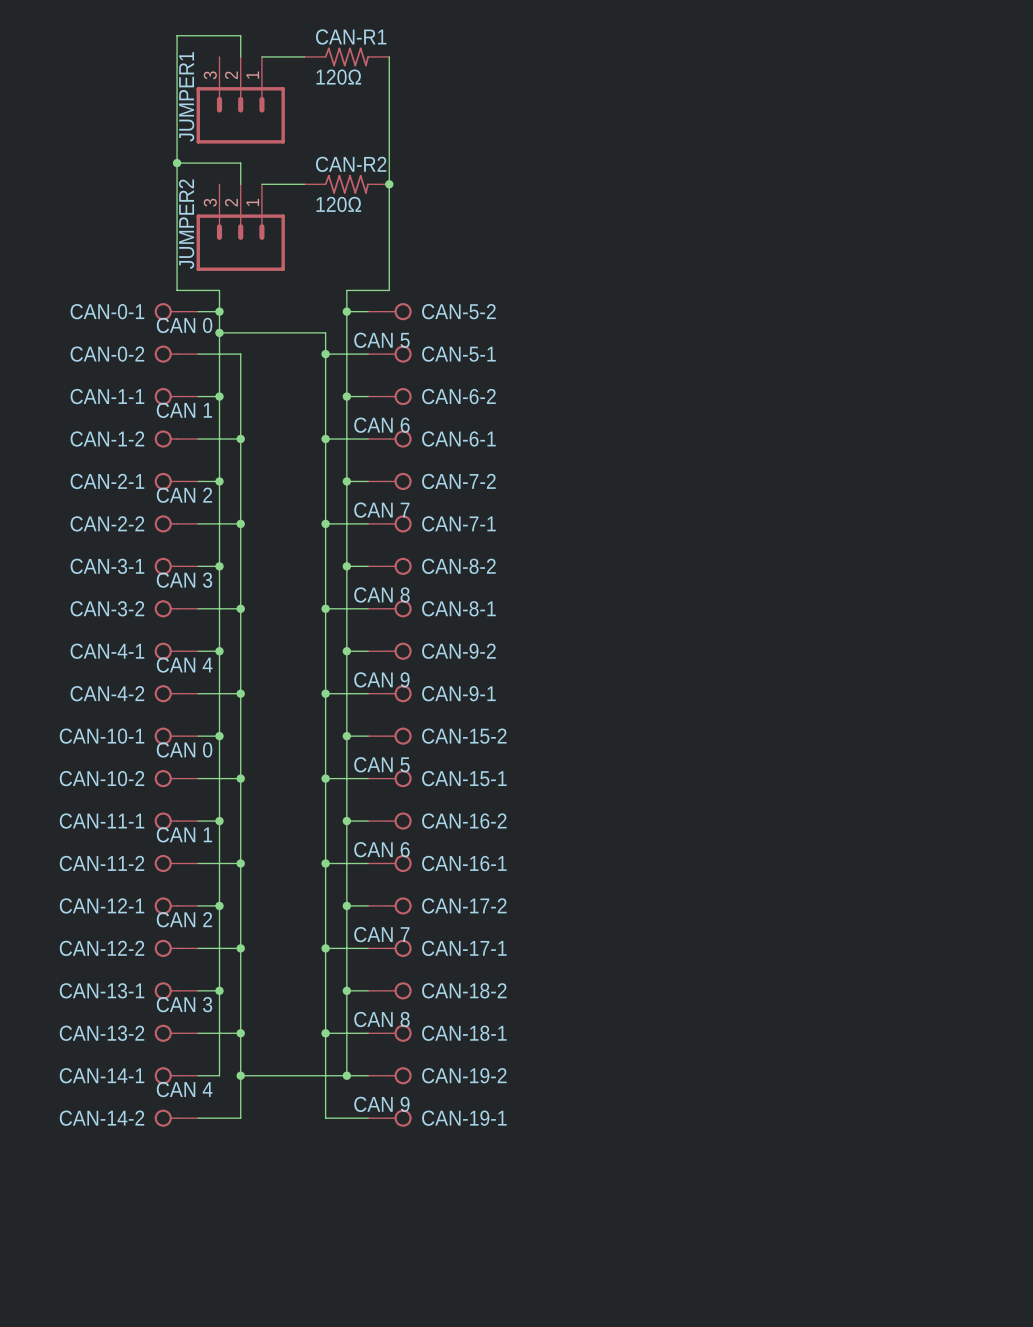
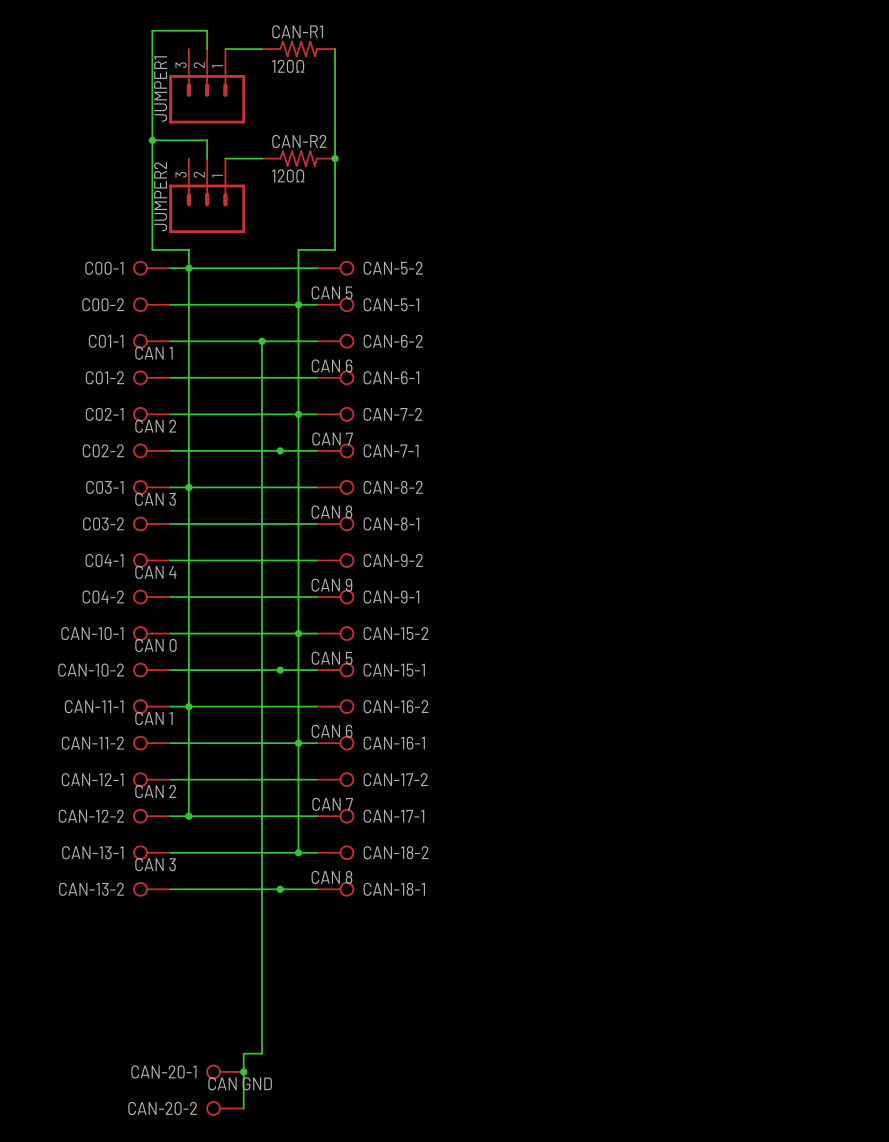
CAN-0-1 name: CAN-0-1 (107, 311) -> C00-1 (104, 268)
wire: none -> (188, 268) (298, 268)
junction: (346, 311) -> none
CAN-0-2 value: CAN 0 (184, 325) -> none
wire: (219, 332) (325, 332) (325, 1118) (368, 1118) -> none
junction: (219, 332) -> none
CAN-0-2 name: CAN-0-2 (107, 354) -> C00-2 (103, 304)
wire: (240, 354) (240, 1118) (198, 1118) -> (207, 304) (280, 304)
junction: (325, 354) -> none
junction: none -> (298, 304)
CAN-1-1 name: CAN-1-1 (107, 396) -> C01-1 (106, 341)
wire: none -> (188, 341) (298, 341)
junction: (219, 396) -> none
wire: none -> (261, 341) (261, 1053) (243, 1053) (243, 1108)
junction: none -> (261, 341)
junction: (346, 396) -> none
CAN-1-2 name: CAN-1-2 (107, 438) -> C01-2 (104, 377)
wire: none -> (207, 377) (280, 377)
junction: (240, 439) -> none
junction: (325, 439) -> none
CAN-2-1 name: CAN-2-1 (107, 481) -> C02-1 (104, 414)
wire: none -> (188, 414) (298, 414)
junction: (219, 481) -> none
CAN-2-2 name: CAN-2-2 (107, 523) -> C02-2 (103, 450)
wire: none -> (207, 450) (280, 450)
junction: (240, 523) -> none
CAN-3-1 name: CAN-3-1 (107, 566) -> C03-1 (104, 487)
wire: none -> (188, 487) (298, 487)
junction: (346, 566) -> none
CAN-3-2 name: CAN-3-2 (107, 608) -> C03-2 (103, 523)
wire: none -> (207, 523) (280, 523)
junction: (240, 608) -> none
junction: (325, 608) -> none
CAN-4-1 name: CAN-4-1 (107, 651) -> C04-1 (104, 560)
wire: none -> (188, 560) (298, 560)
junction: (219, 651) -> none
junction: (346, 651) -> none
CAN-4-2 name: CAN-4-2 (107, 693) -> C04-2 (103, 597)
wire: none -> (207, 597) (280, 597)
junction: (240, 693) -> none
junction: (325, 693) -> none
wire: none -> (188, 633) (298, 633)
junction: (219, 736) -> none
wire: none -> (207, 670) (280, 670)
junction: (240, 778) -> none
wire: none -> (188, 706) (298, 706)
junction: (346, 821) -> none
wire: none -> (207, 743) (280, 743)
junction: (240, 863) -> none
junction: (325, 863) -> none
junction: none -> (298, 743)
junction: (219, 905) -> none
junction: (346, 905) -> none
wire: (219, 948) (219, 1075) (198, 1075) -> none
junction: none -> (188, 816)
wire: none -> (207, 816) (280, 816)
junction: (240, 948) -> none
junction: (325, 948) -> none
junction: (219, 990) -> none
wire: (346, 990) (346, 1075) -> (298, 852) (188, 852)
wire: none -> (207, 889) (280, 889)
junction: (240, 1033) -> none
CAN-14-1: (176, 1075) -> none
wire: (240, 1075) (368, 1075) -> (188, 779) (298, 779)
junction: (240, 1075) -> none
junction: (346, 1075) -> none
CAN-19-2: CAN 9 (389, 1075) -> none
CAN-14-2: CAN 4 (176, 1118) -> none
CAN-19-1: (389, 1118) -> none
CAN-20-1: none -> (224, 1071)
junction: none -> (243, 1071)
CAN-20-2: none -> CAN GND (224, 1108)

